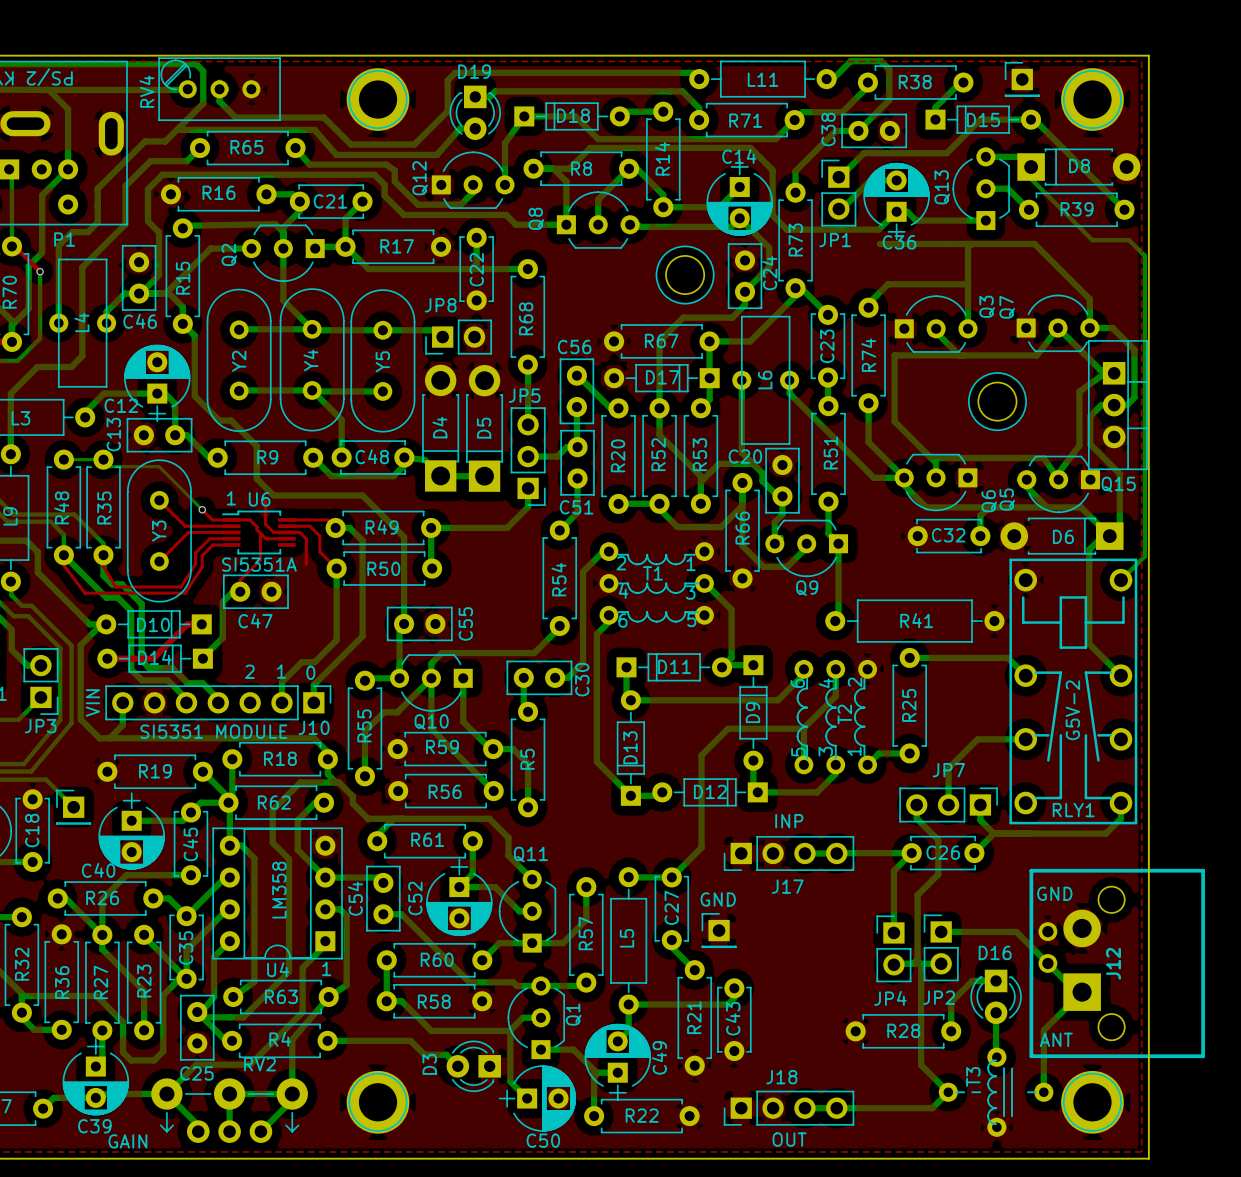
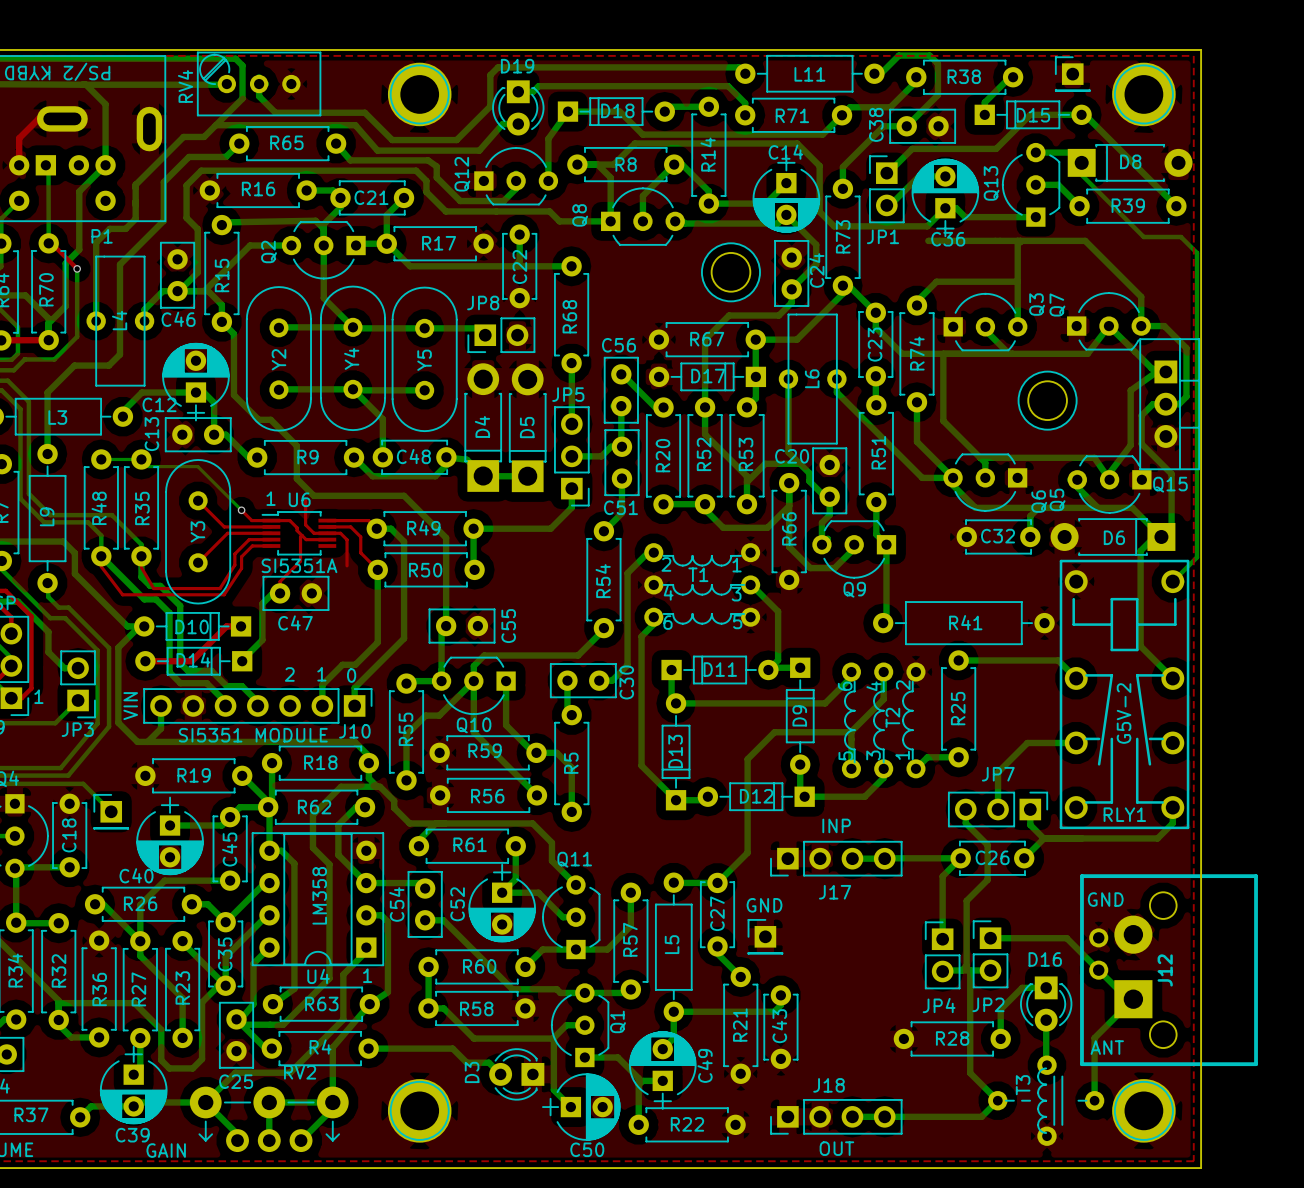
bottom track: none -> (875, 312) (875, 327) (902, 353) (943, 353)

